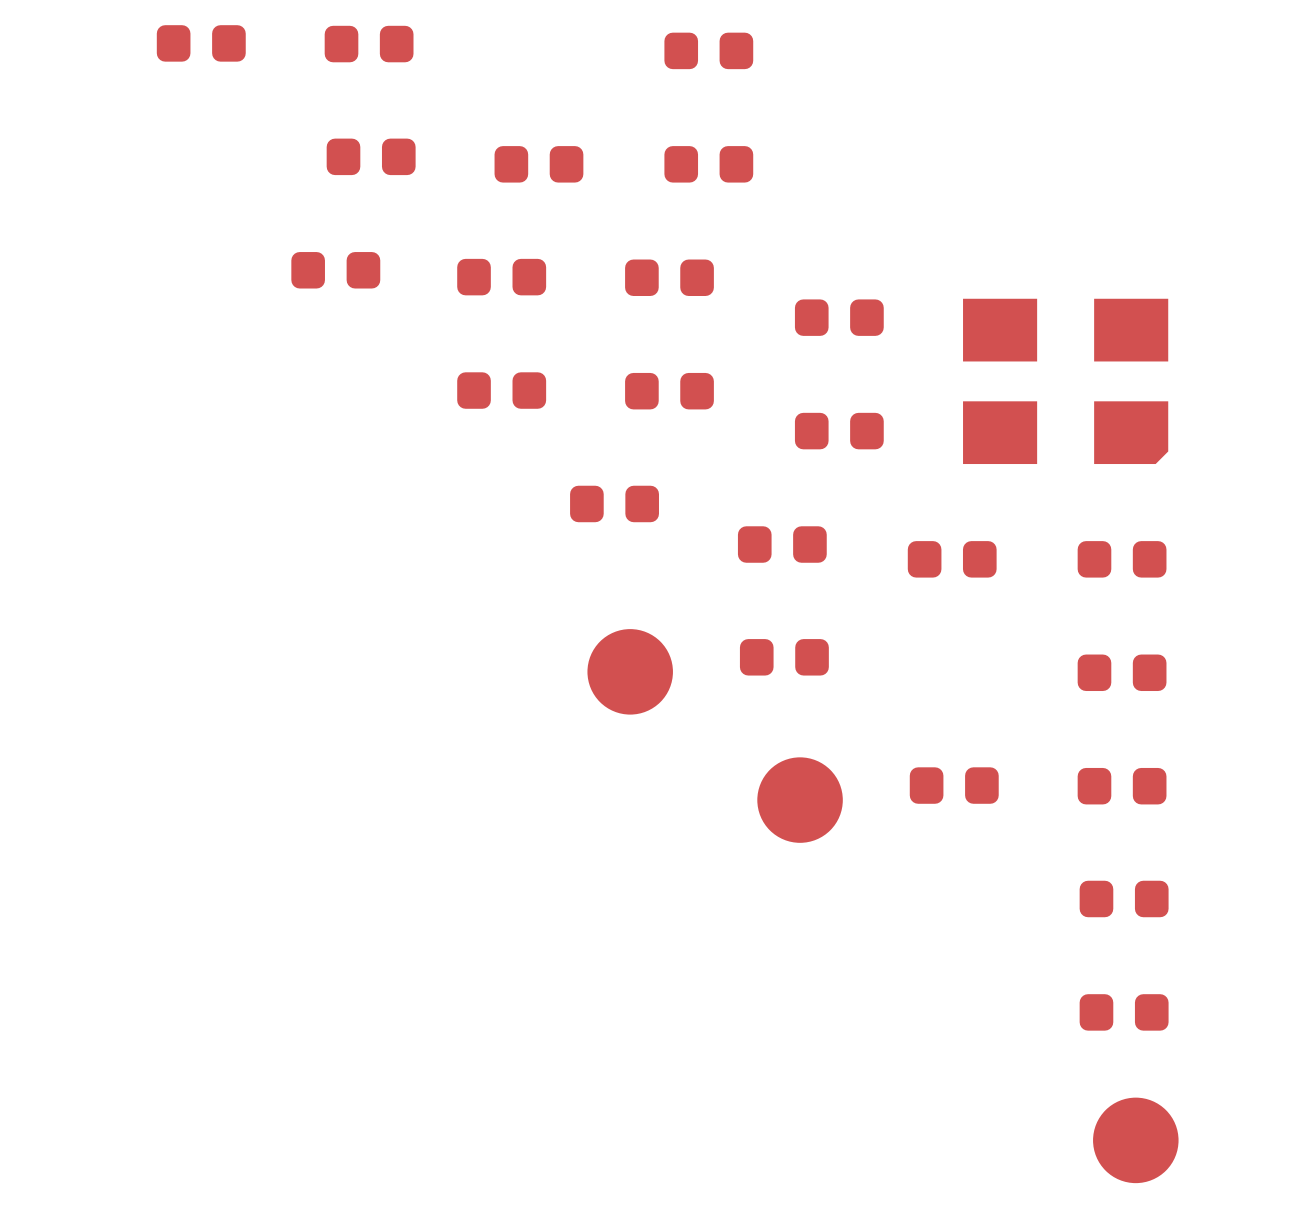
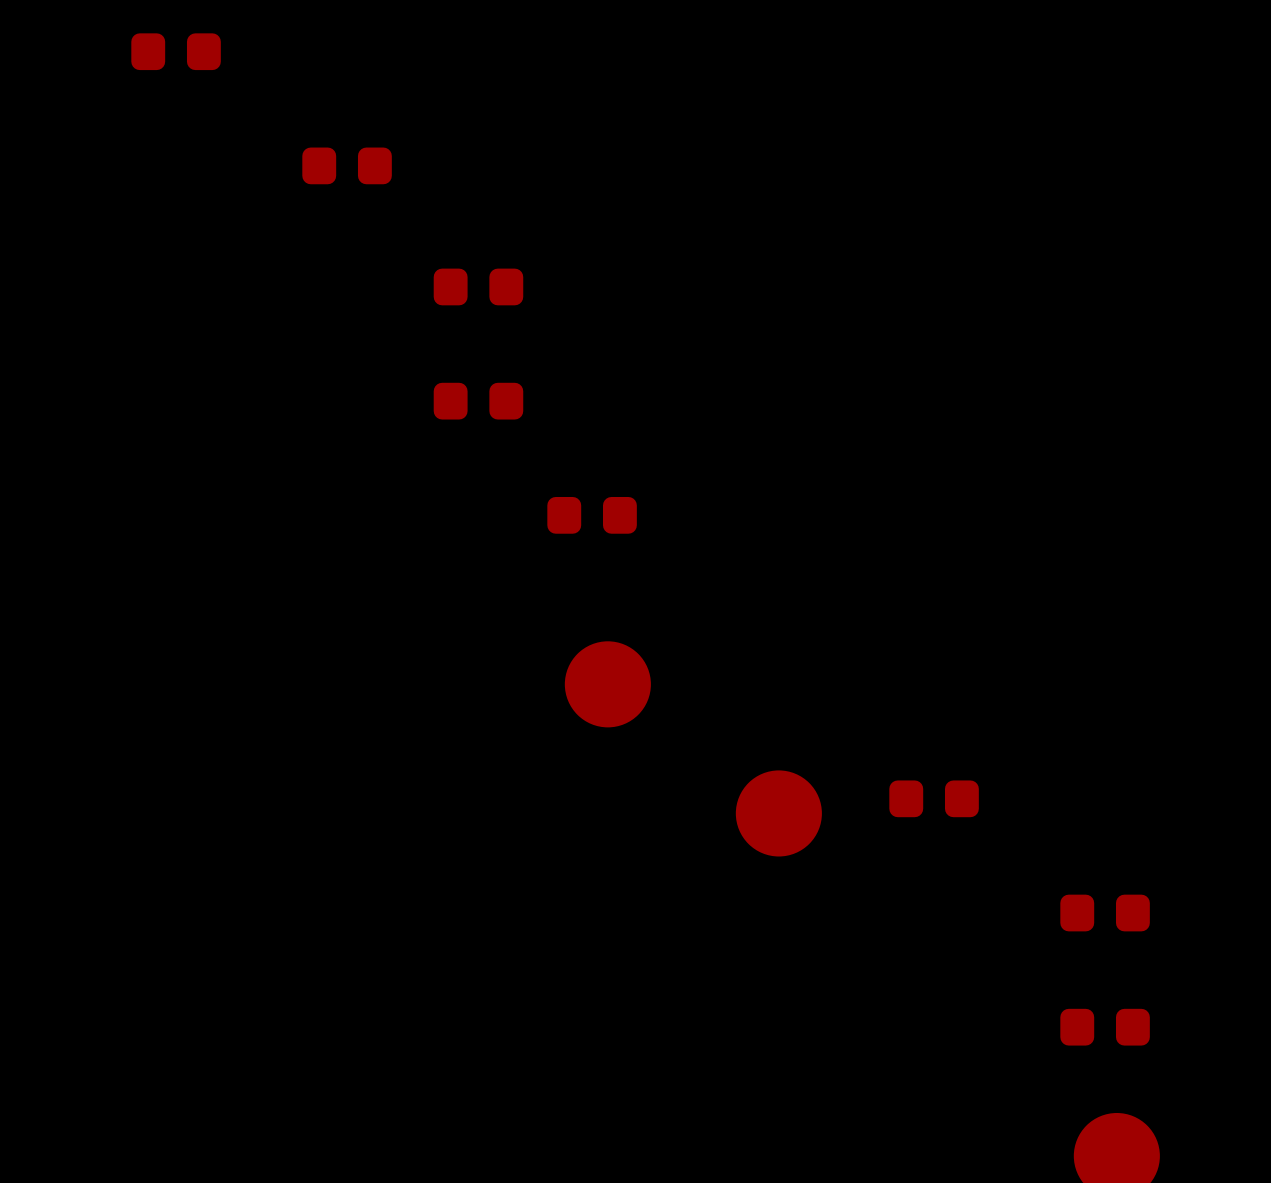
part: (369, 44) -> none
part: (708, 50) -> none
part: (538, 164) -> none
part: (708, 164) -> none
part: (335, 270) -> none
part: (669, 277) -> none
part: (839, 317) -> none
part: (1065, 381) -> none
part: (669, 391) -> none
part: (839, 431) -> none
part: (782, 544) -> none
part: (952, 559) -> none
part: (1122, 559) -> none
part: (784, 657) -> none
part: (1122, 672) -> none
part: (1122, 786) -> none

